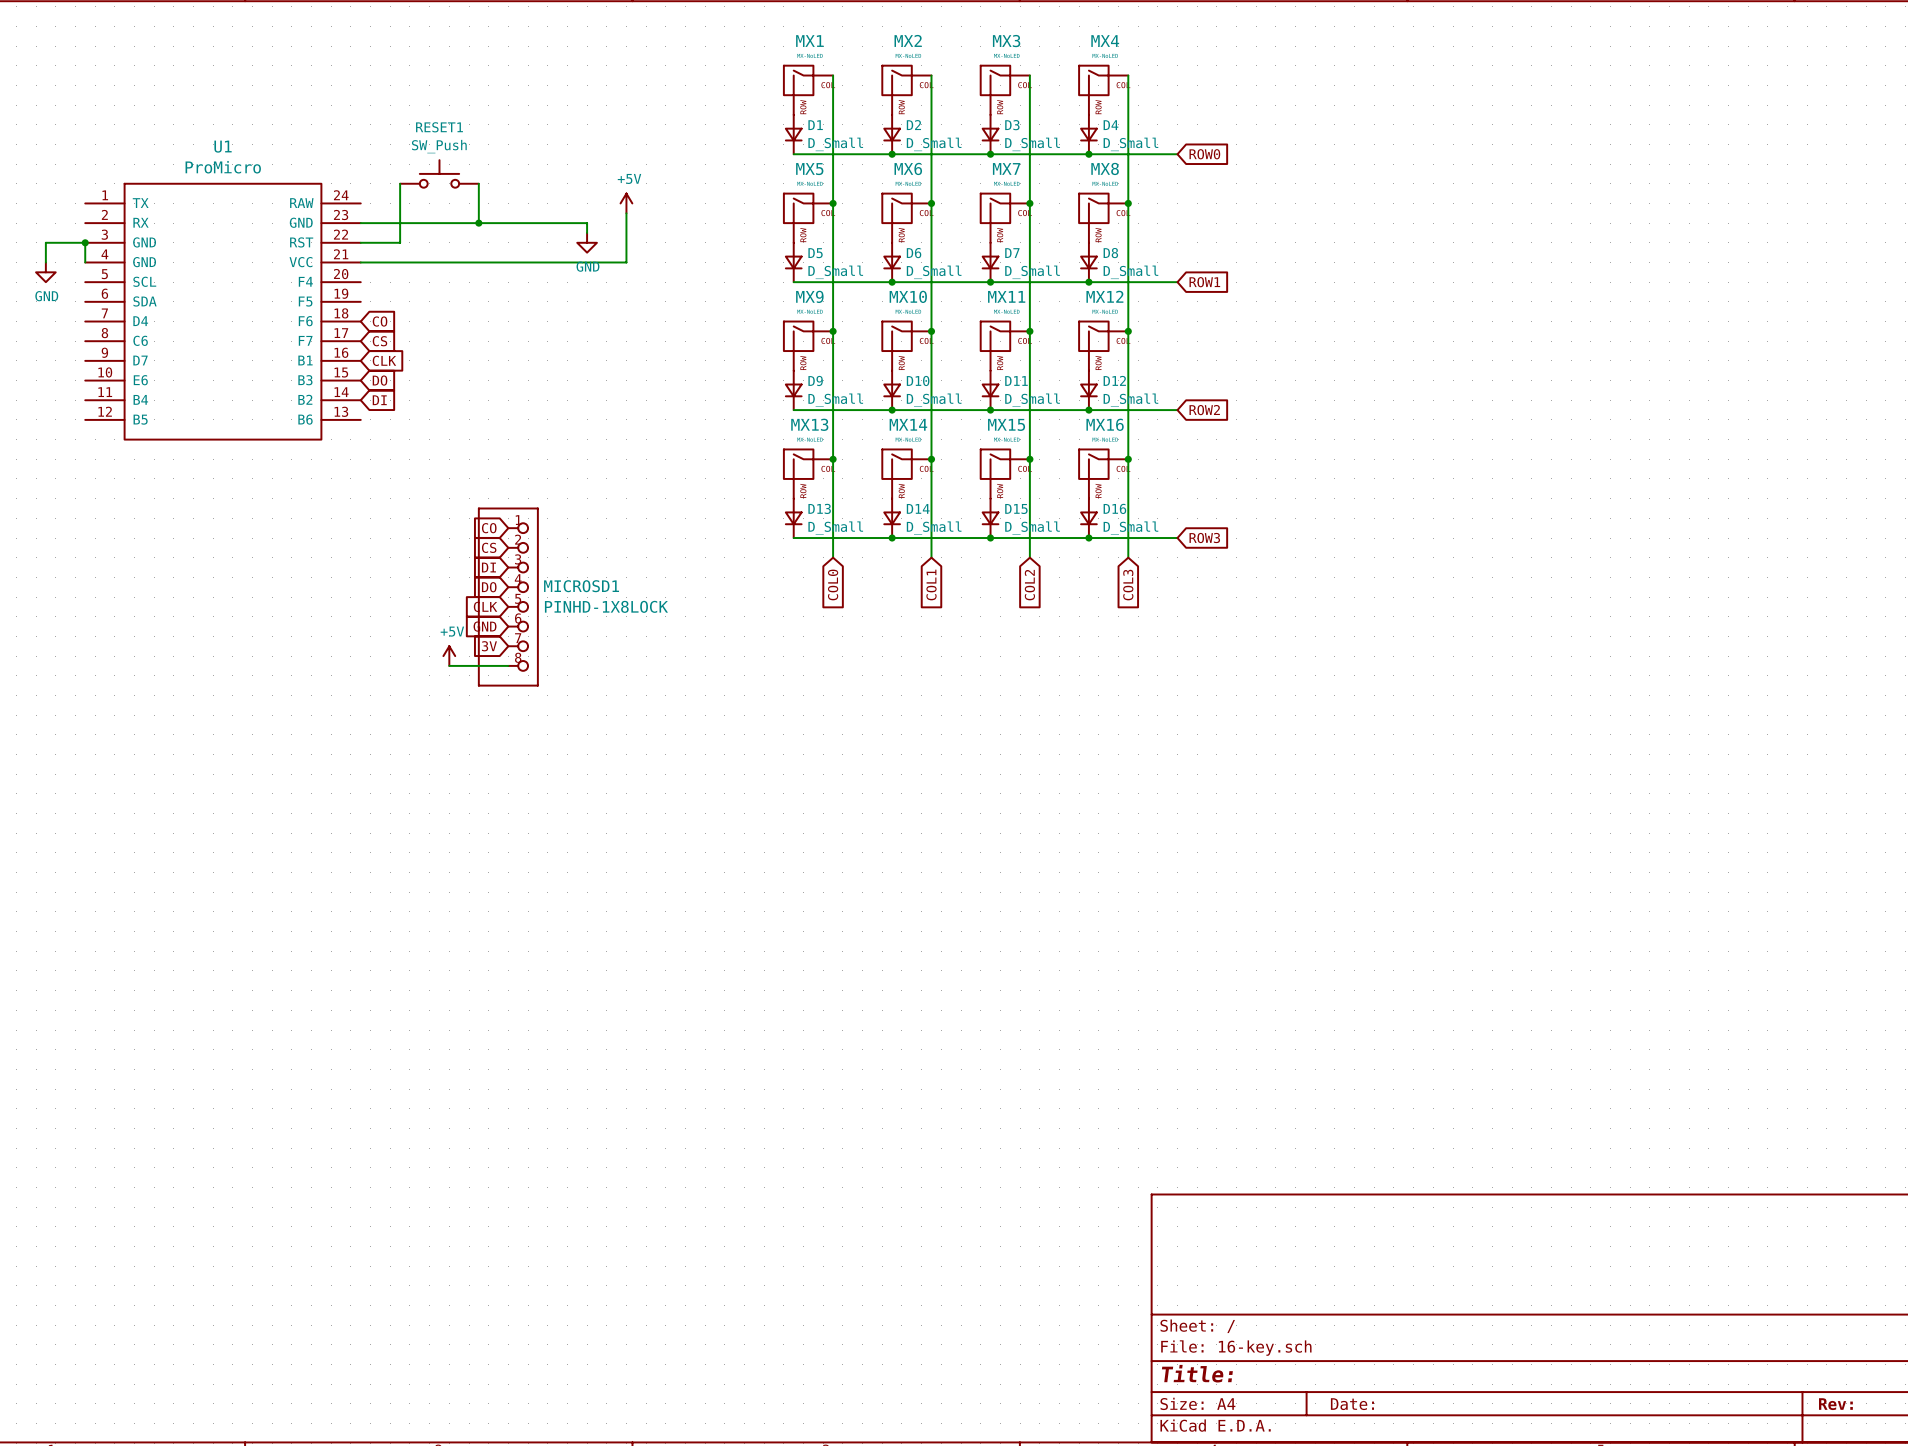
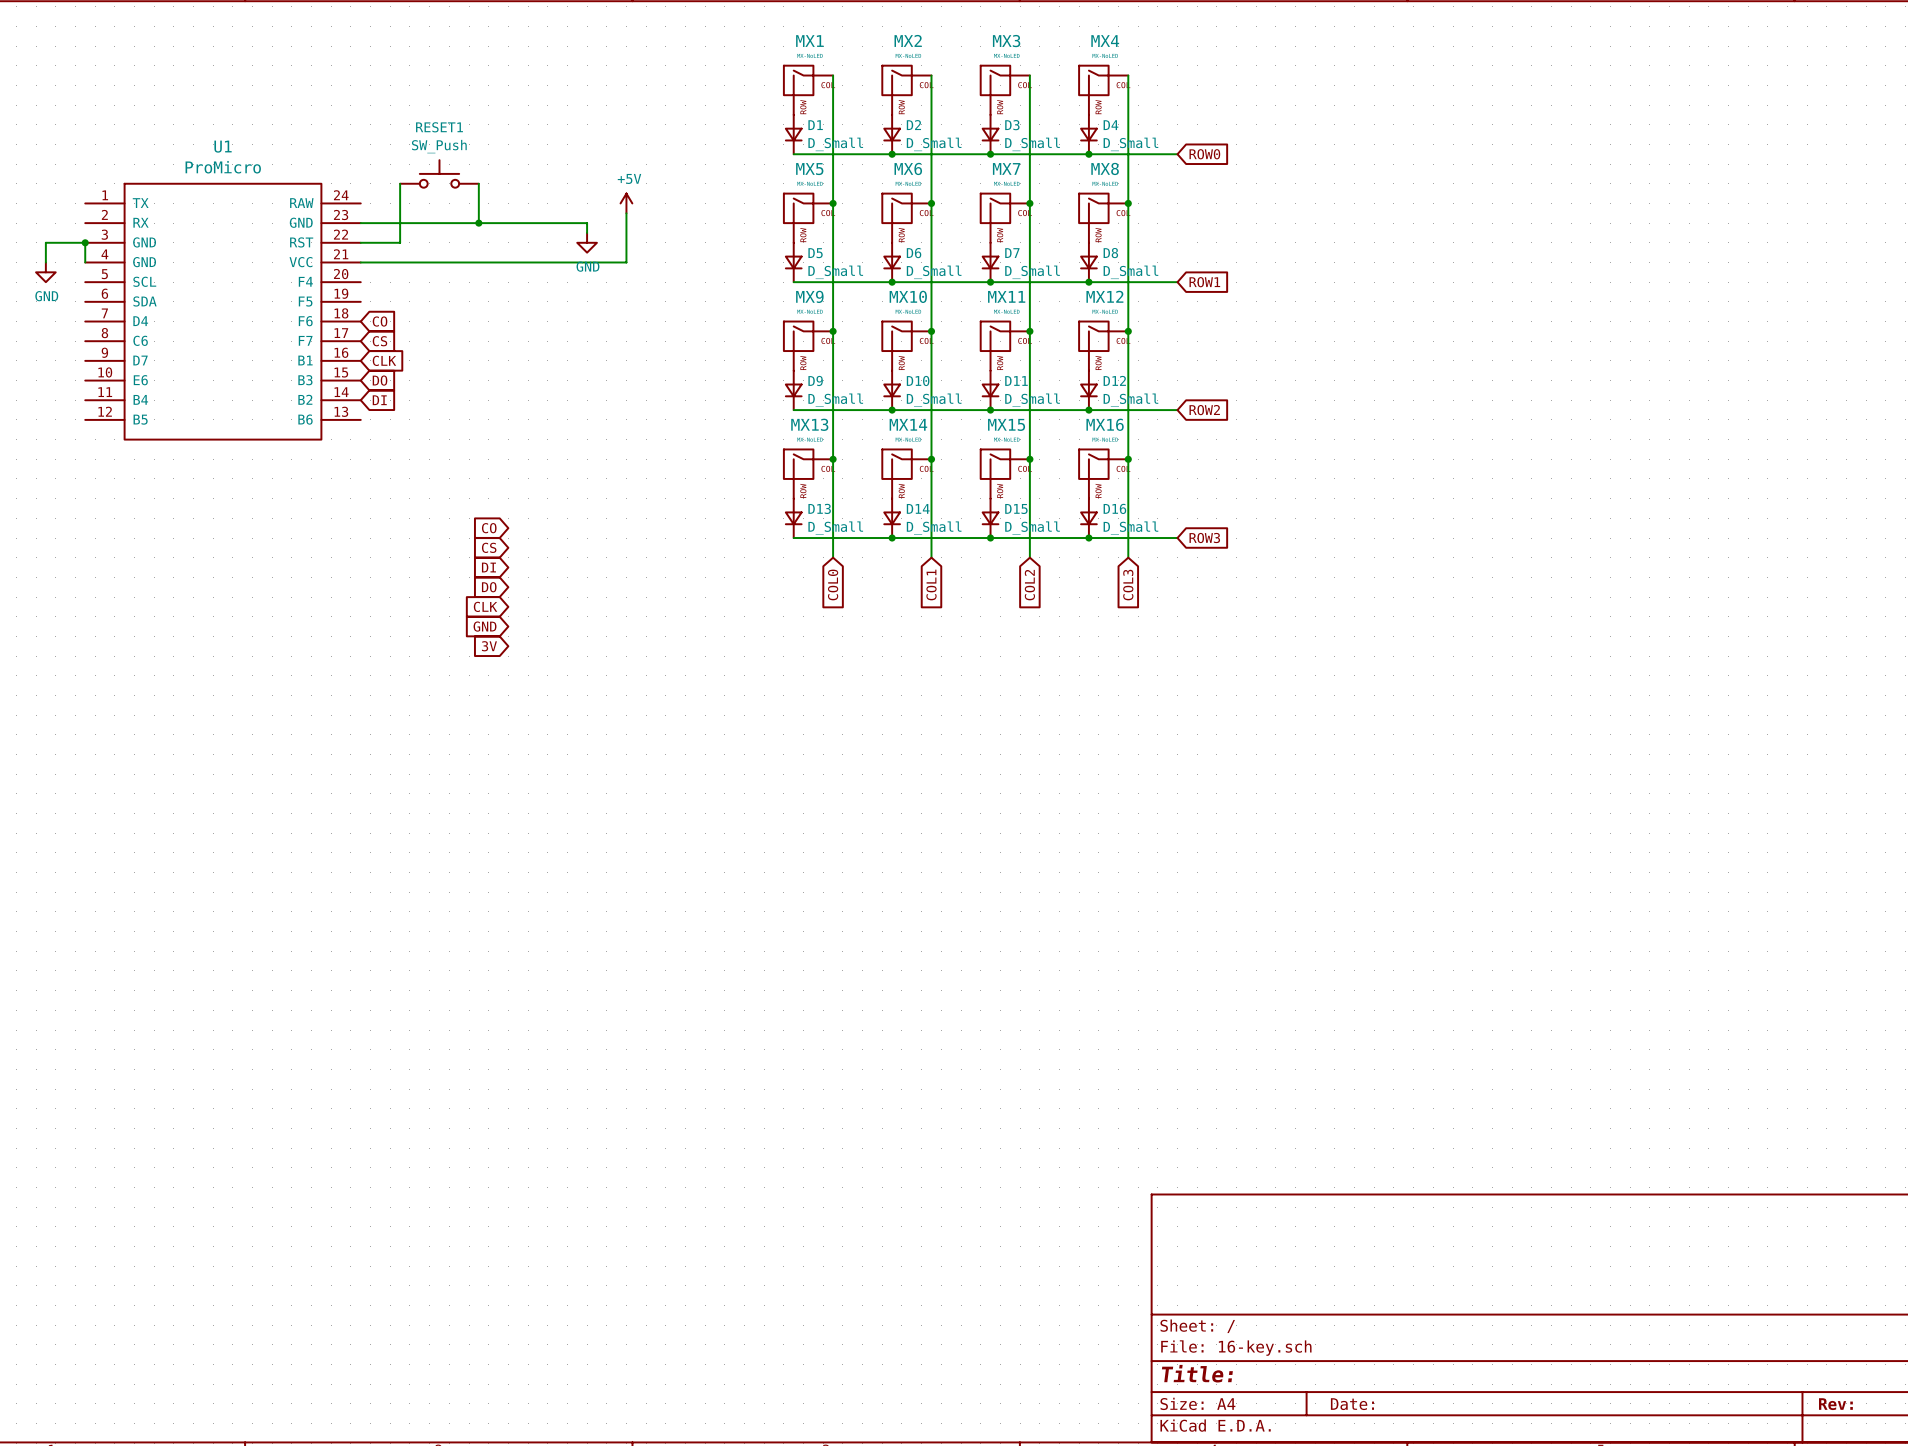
MICROSD1: PINHD-1X8LOCK (508, 597) -> none
power symbol: +5V (449, 656) -> none
wire: (449, 665) (508, 665) -> none

